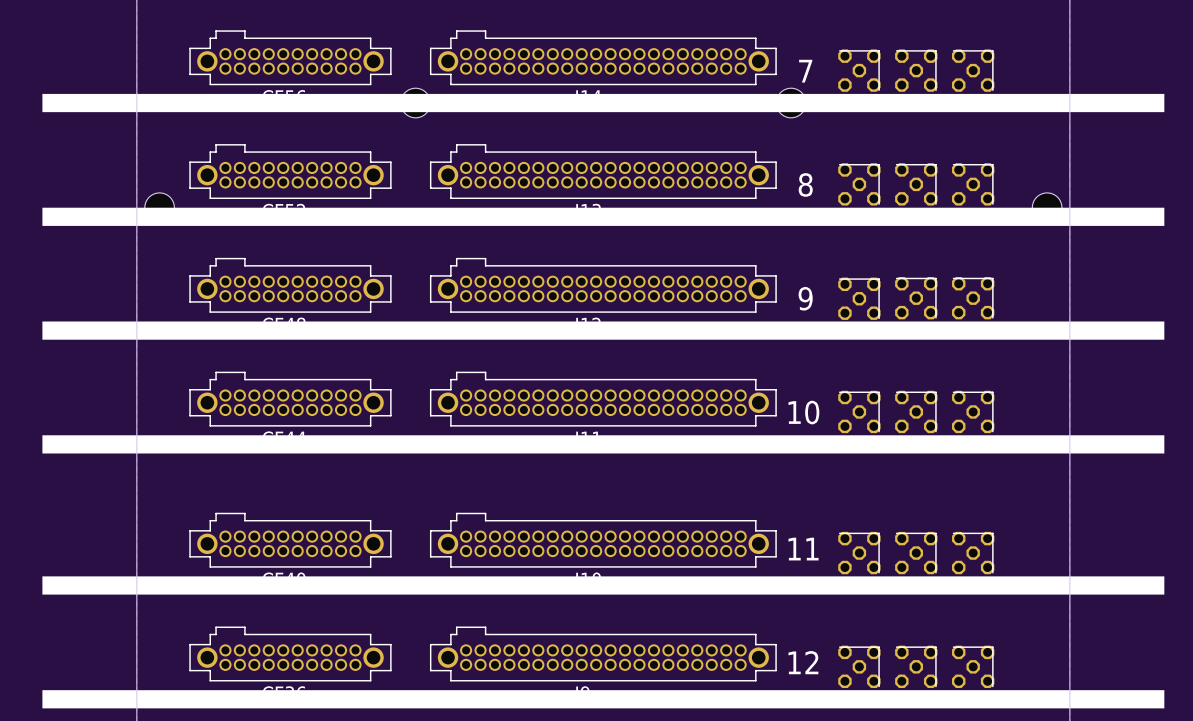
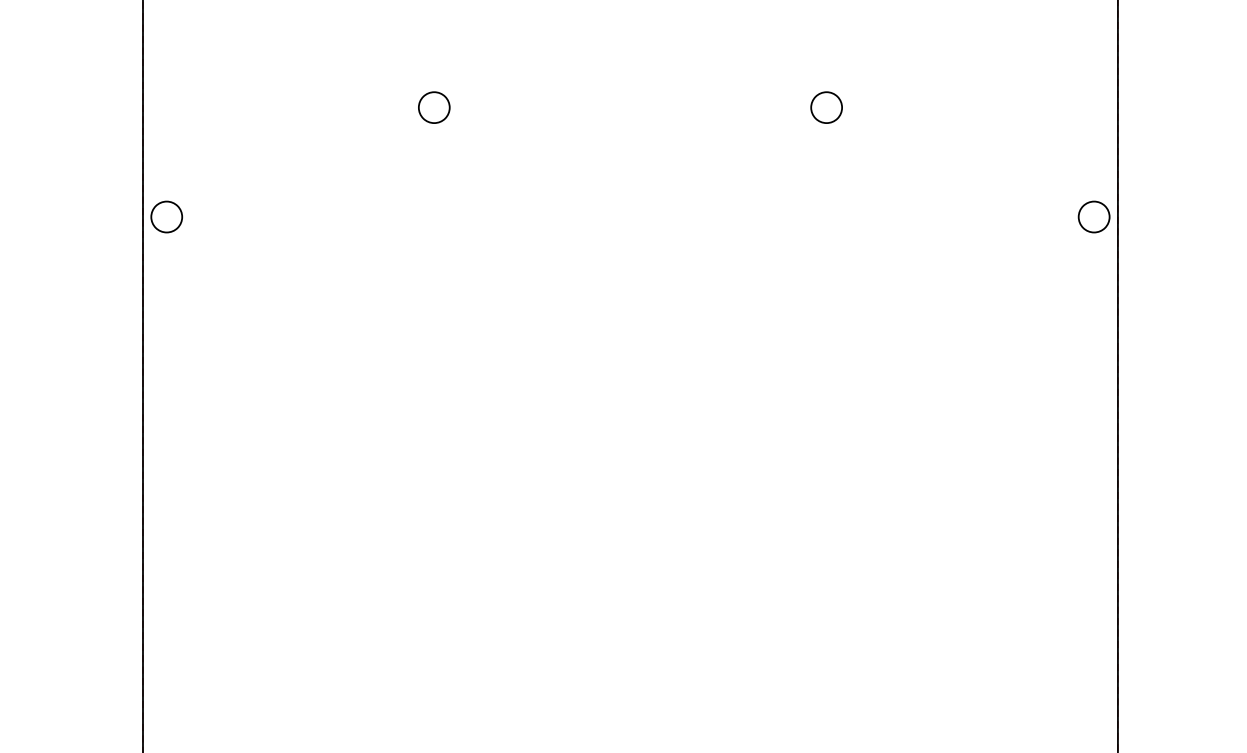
part: (290, 57) -> none
part: (603, 57) -> none
part: (859, 70) -> none
part: (916, 70) -> none
part: (973, 70) -> none
text: 7 (805, 71) -> none
drawing: [42, 93, 1165, 113] -> none
part: (290, 171) -> none
part: (603, 171) -> none
text: 8 (805, 184) -> none
part: (859, 184) -> none
part: (916, 184) -> none
part: (973, 184) -> none
drawing: [42, 207, 1165, 226] -> none
part: (290, 285) -> none
part: (603, 285) -> none
text: 9 (805, 298) -> none
part: (859, 298) -> none
part: (916, 298) -> none
part: (973, 298) -> none
drawing: [42, 321, 1165, 340] -> none
part: (290, 399) -> none
part: (603, 399) -> none
part: (859, 411) -> none
part: (916, 411) -> none
part: (973, 411) -> none
text: 10 (803, 412) -> none
drawing: [42, 435, 1165, 454] -> none
part: (290, 540) -> none
part: (603, 540) -> none
text: 11 (803, 549) -> none
part: (859, 553) -> none
part: (916, 553) -> none
part: (973, 553) -> none
drawing: [42, 576, 1165, 595] -> none
part: (290, 654) -> none
part: (603, 654) -> none
text: 12 (803, 662) -> none
part: (859, 666) -> none
part: (916, 666) -> none
part: (973, 666) -> none
drawing: [42, 690, 1165, 709] -> none

